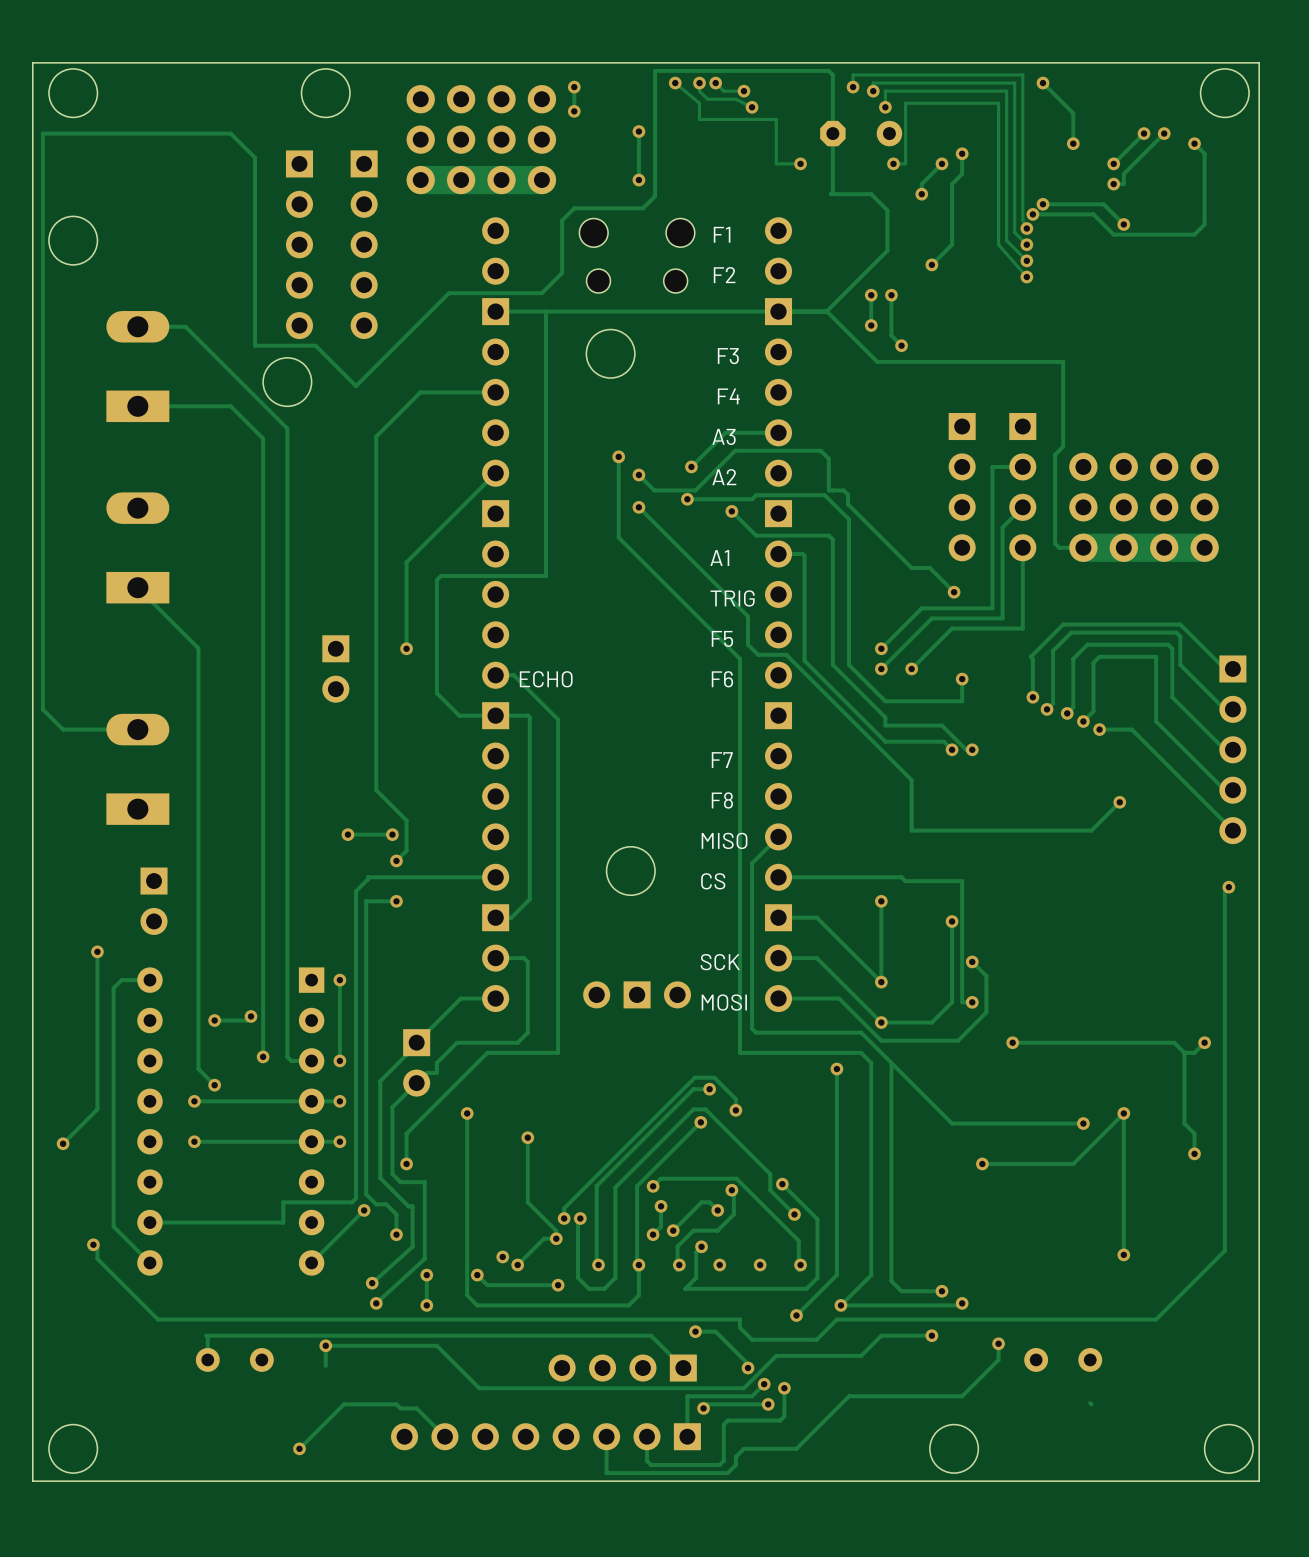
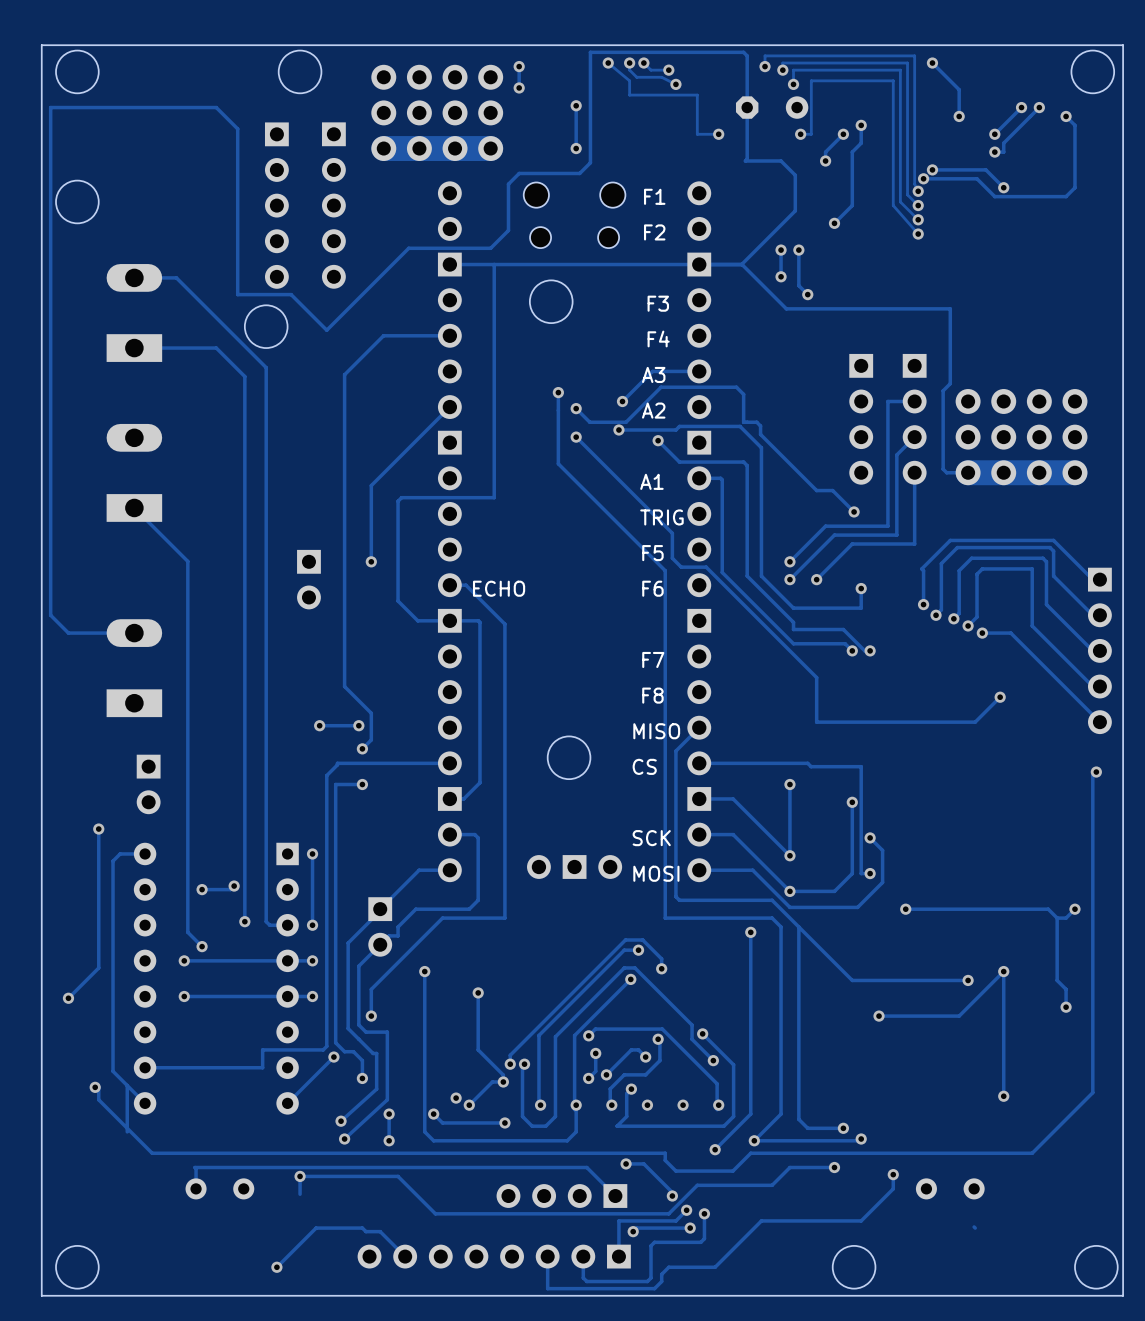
track: none -> (127, 1085) (127, 1131)

